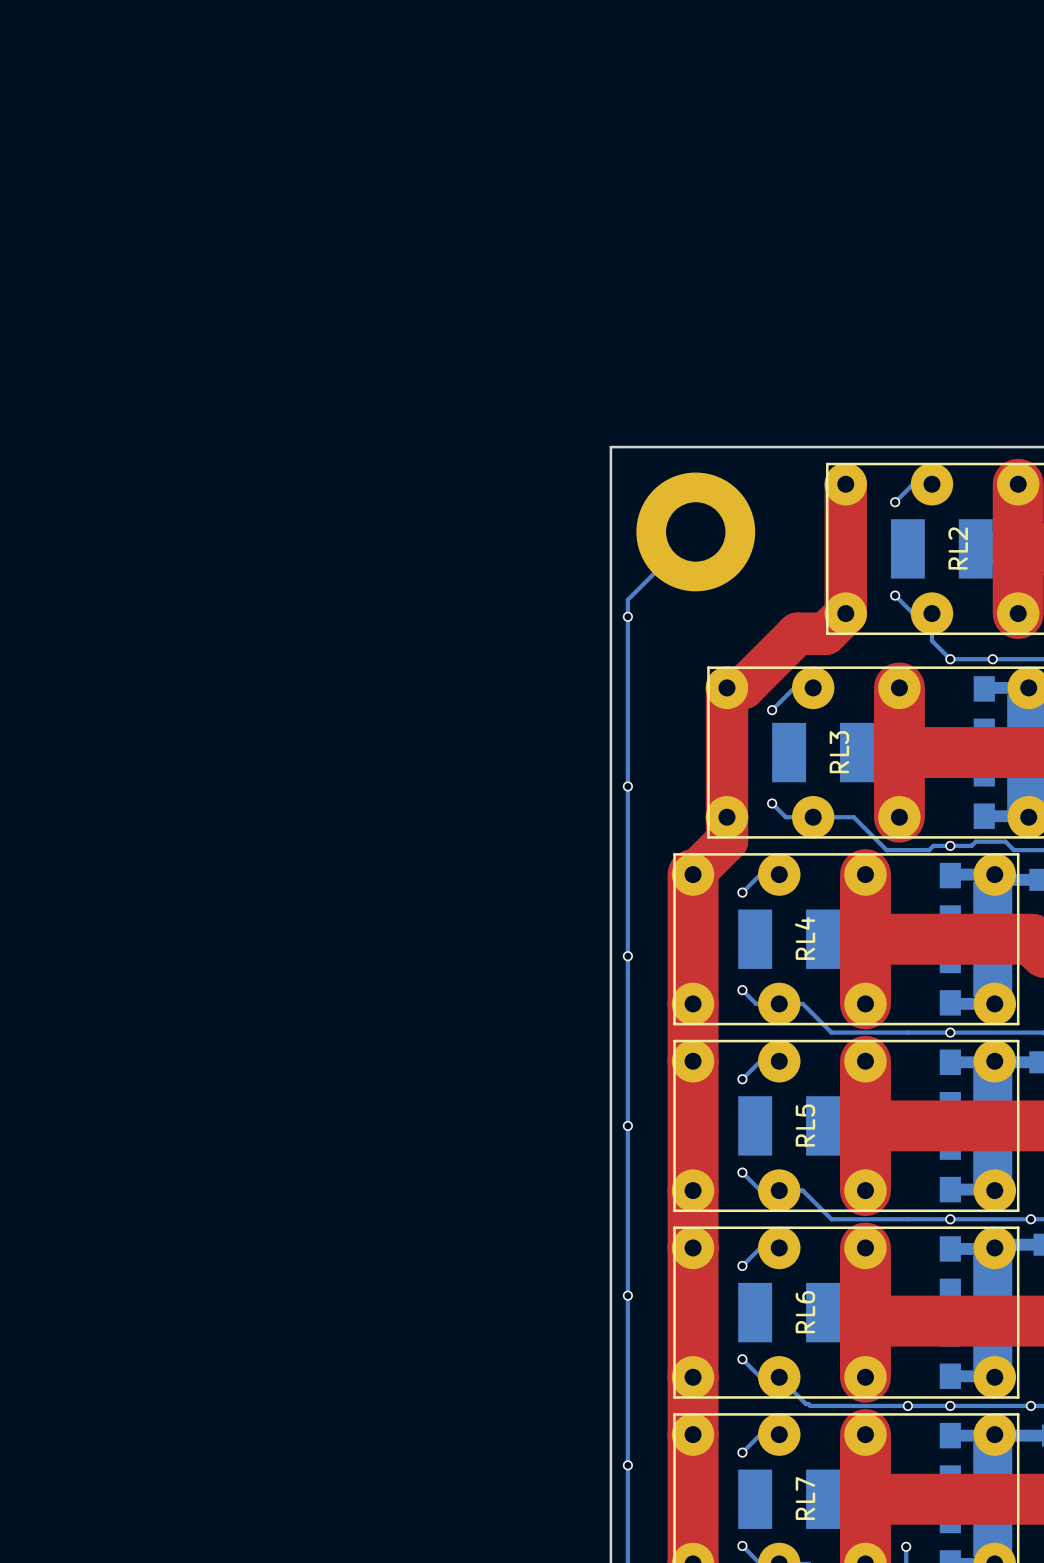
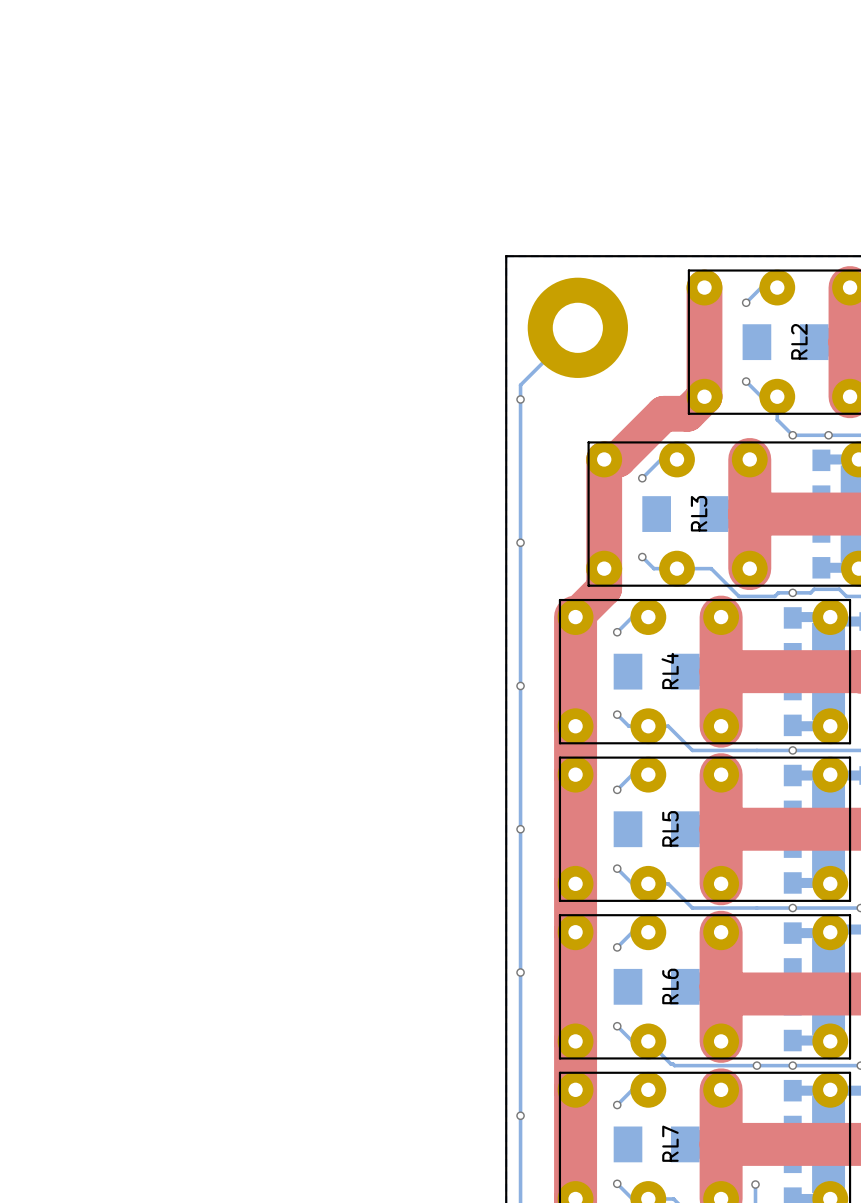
part footprint: [890, 519, 993, 579] -> [742, 324, 829, 361]
part footprint: [772, 722, 874, 783] -> [642, 496, 729, 532]
part footprint: [738, 909, 841, 969] -> [613, 653, 700, 690]
part footprint: [738, 1096, 841, 1156] -> [613, 811, 700, 848]
part footprint: [738, 1282, 841, 1343] -> [613, 968, 700, 1005]
part footprint: [738, 1469, 841, 1529] -> [613, 1126, 700, 1163]

